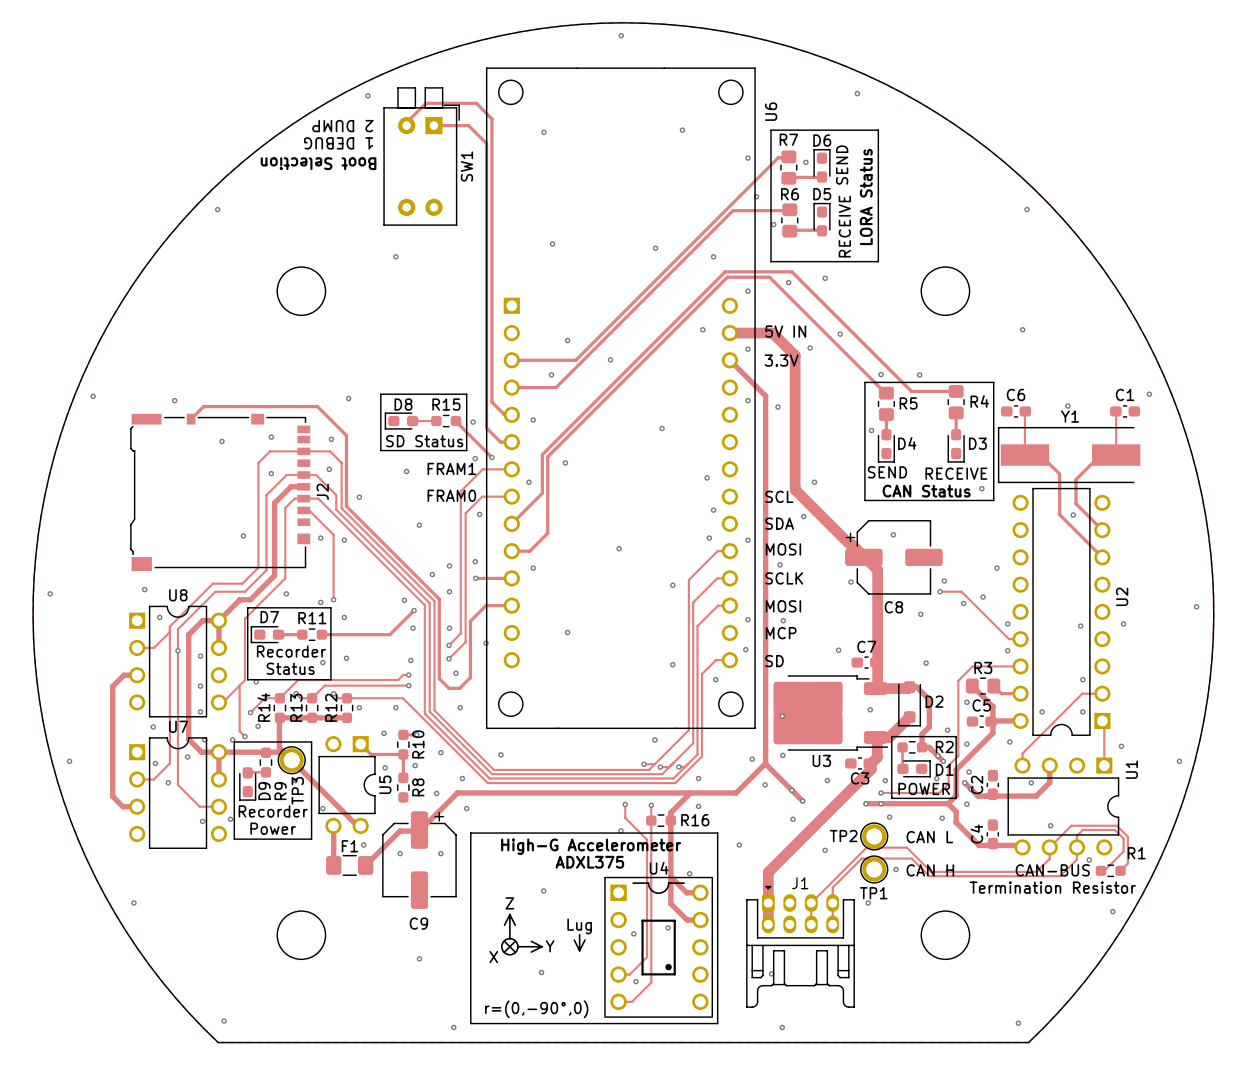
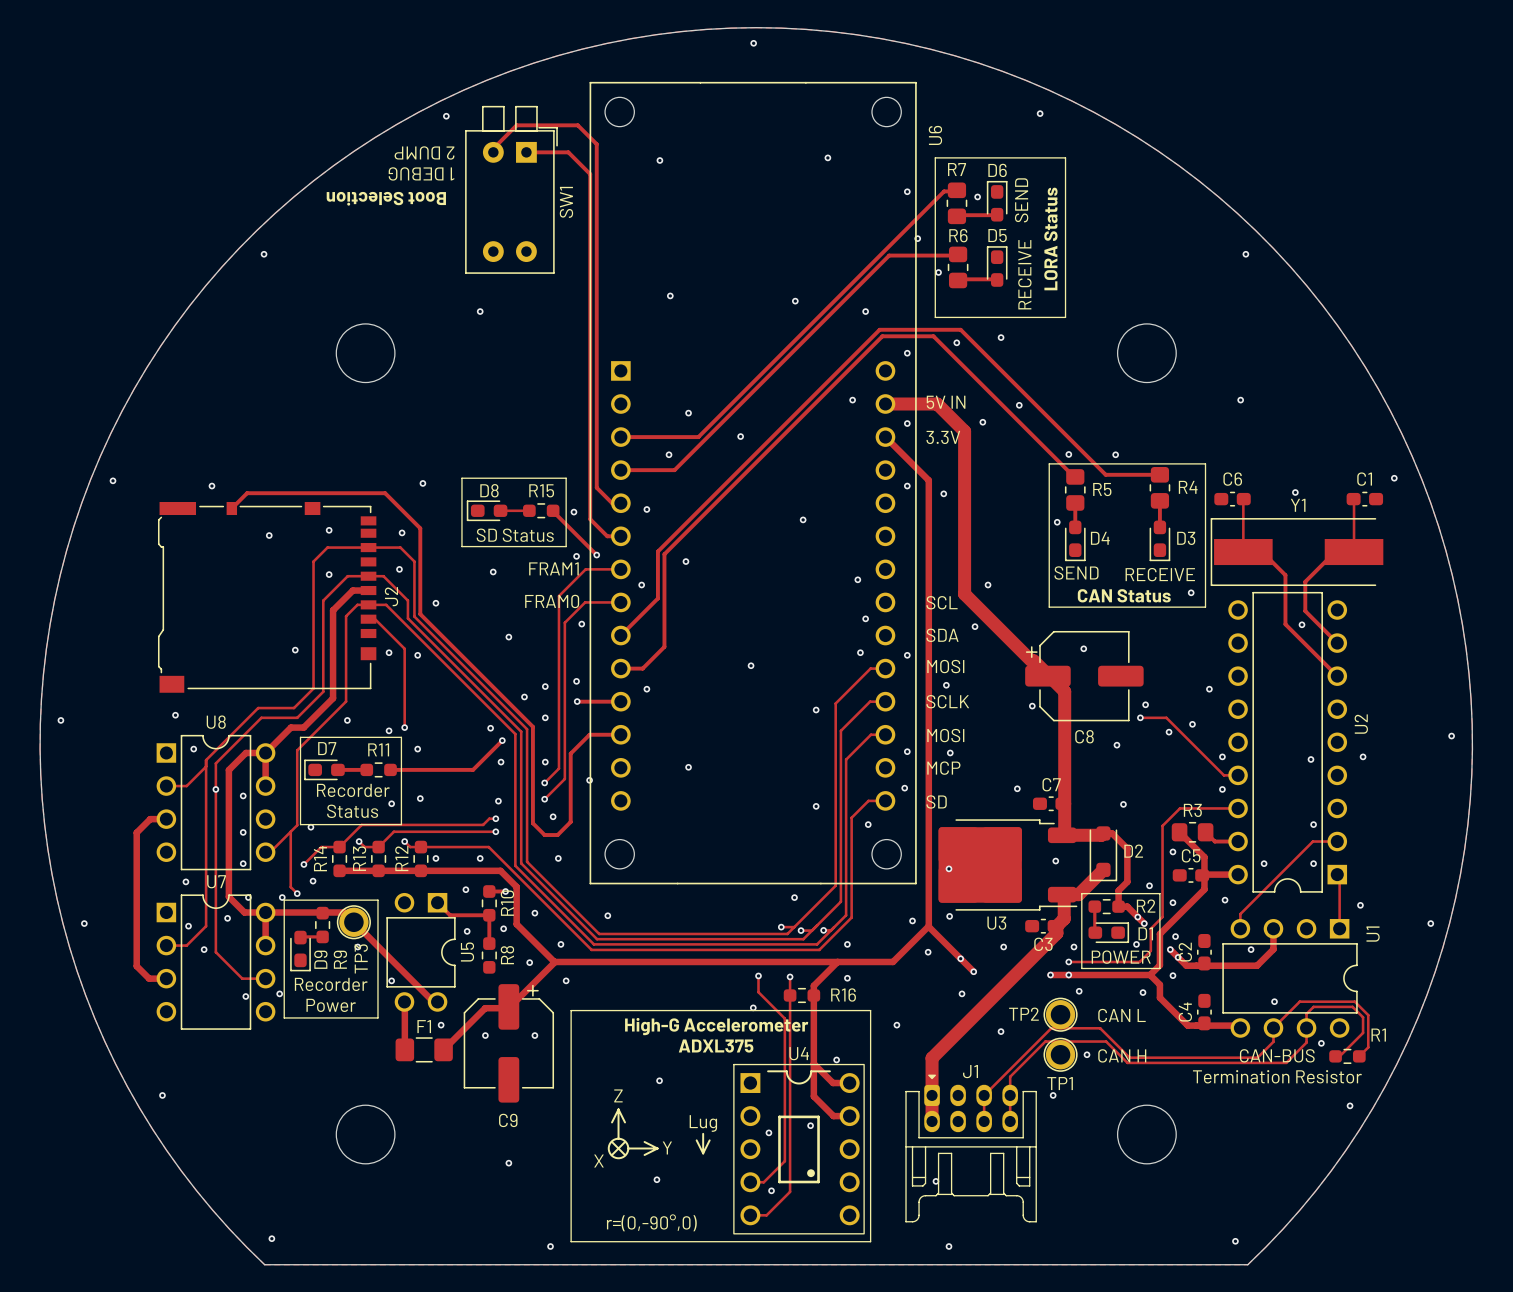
track: (279, 717) (279, 747) (283, 752) -> none
track: none -> (420, 870) (500, 870) (516, 886) (516, 924) (554, 961)

